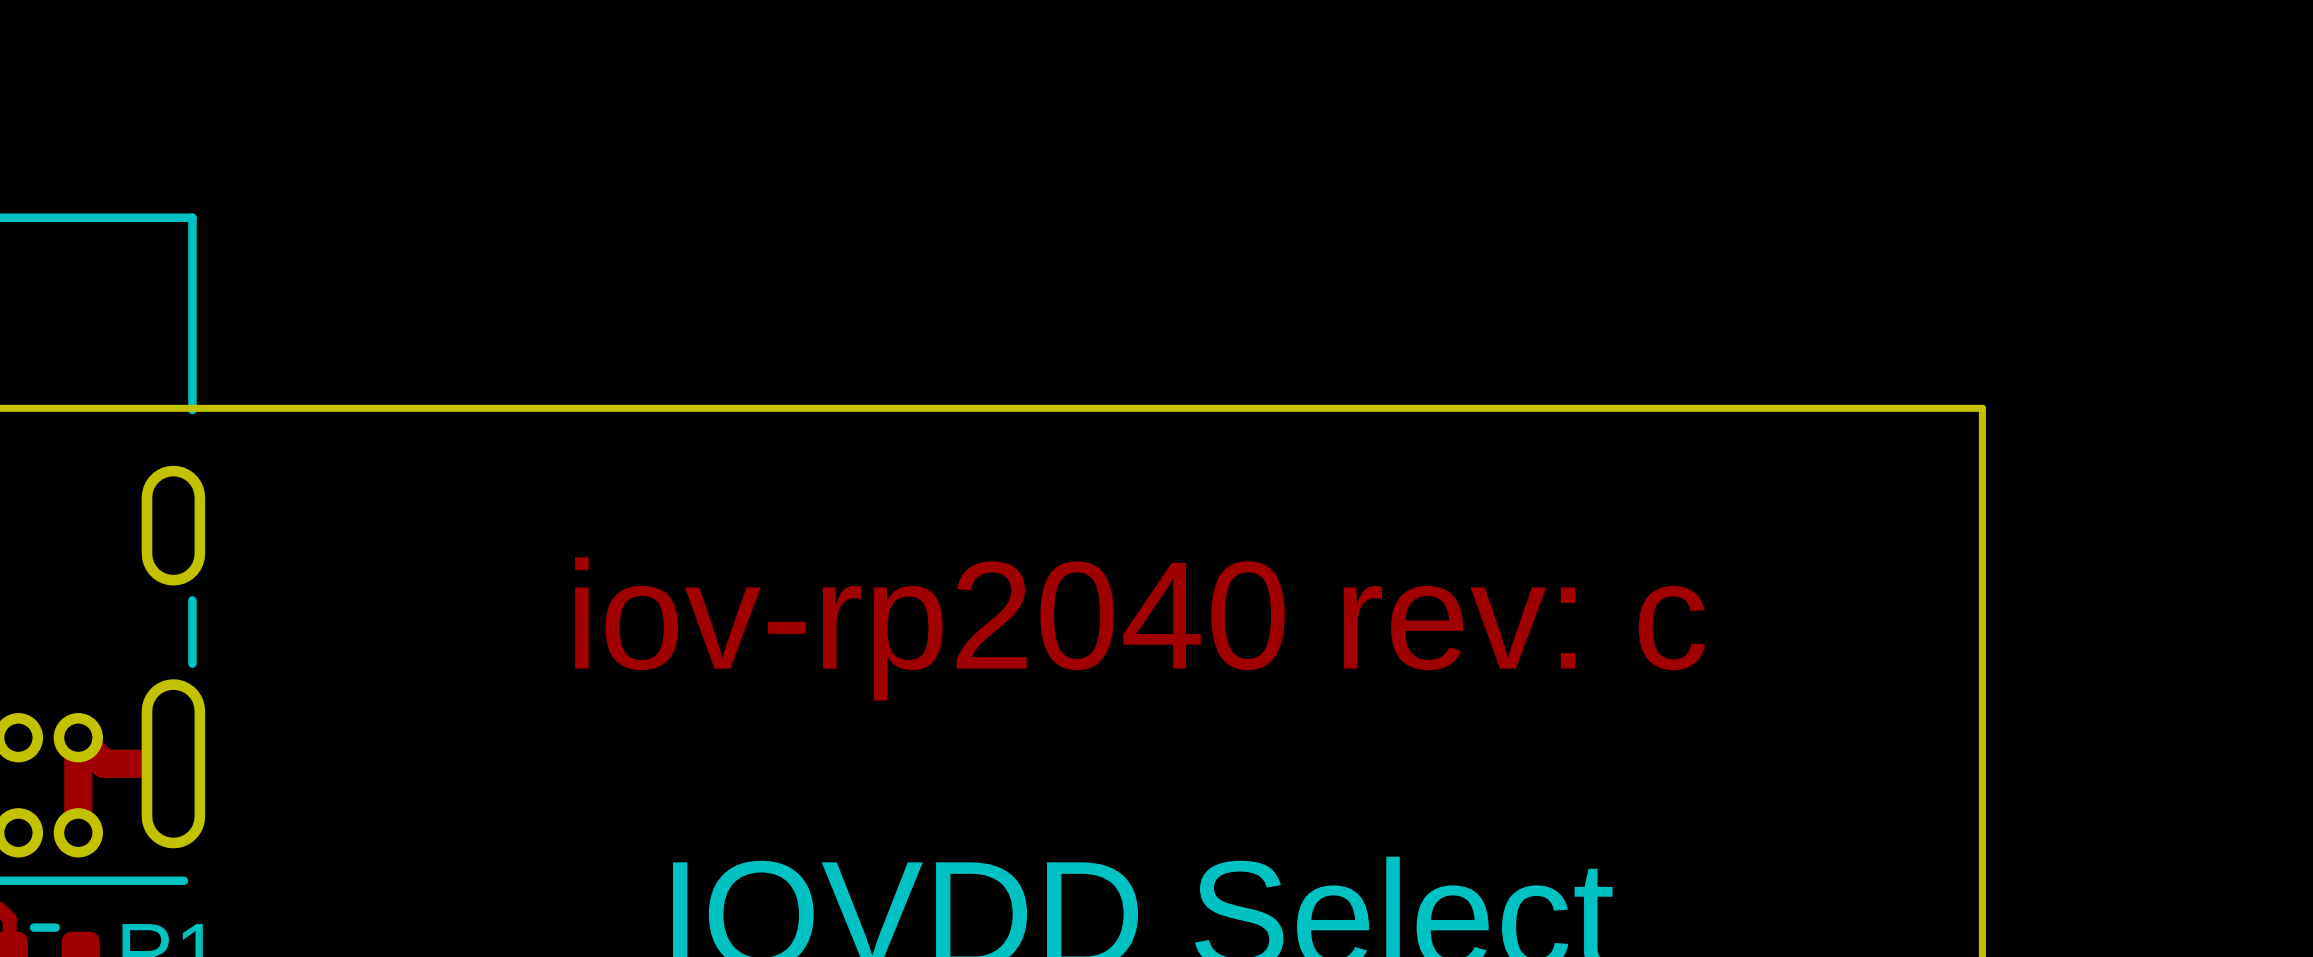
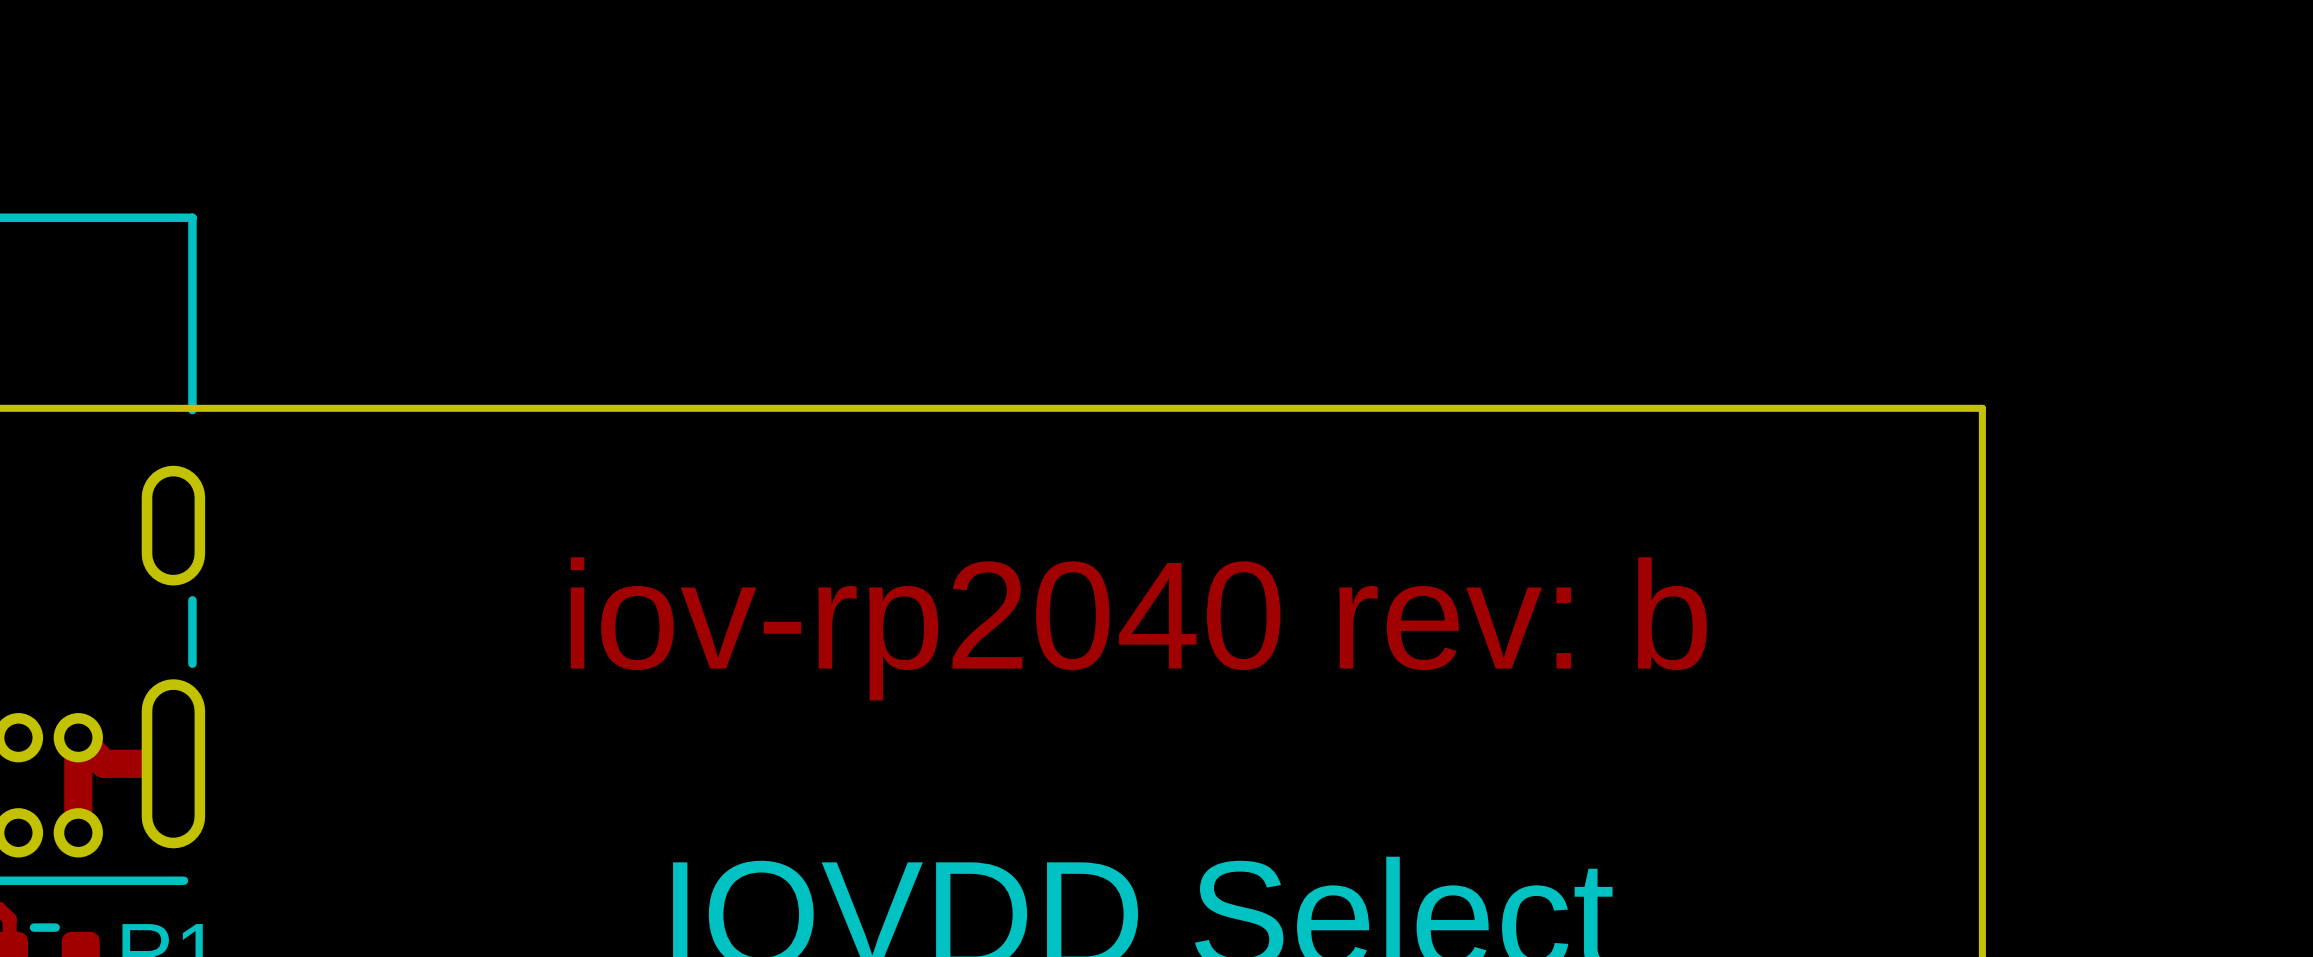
text: iov-rp2040 rev: c (1140, 628) -> iov-rp2040 rev: b (1138, 628)

